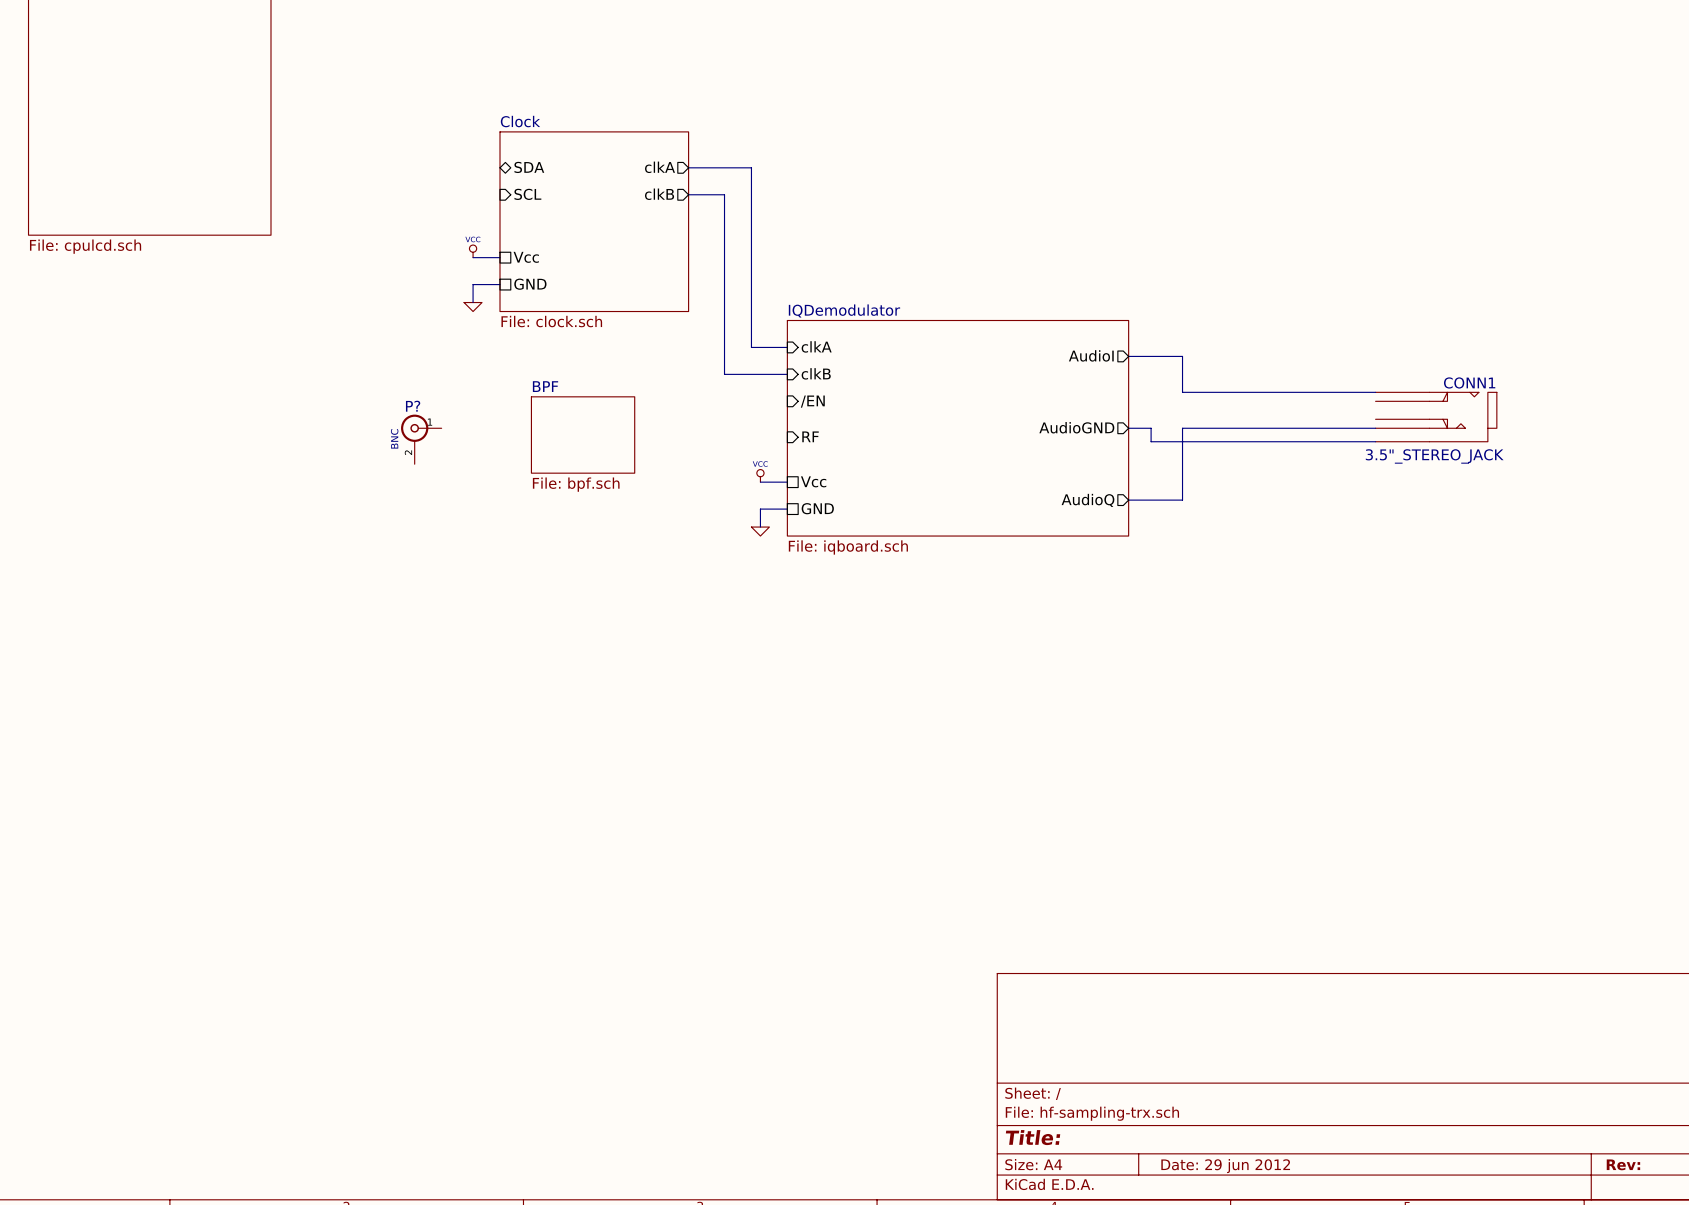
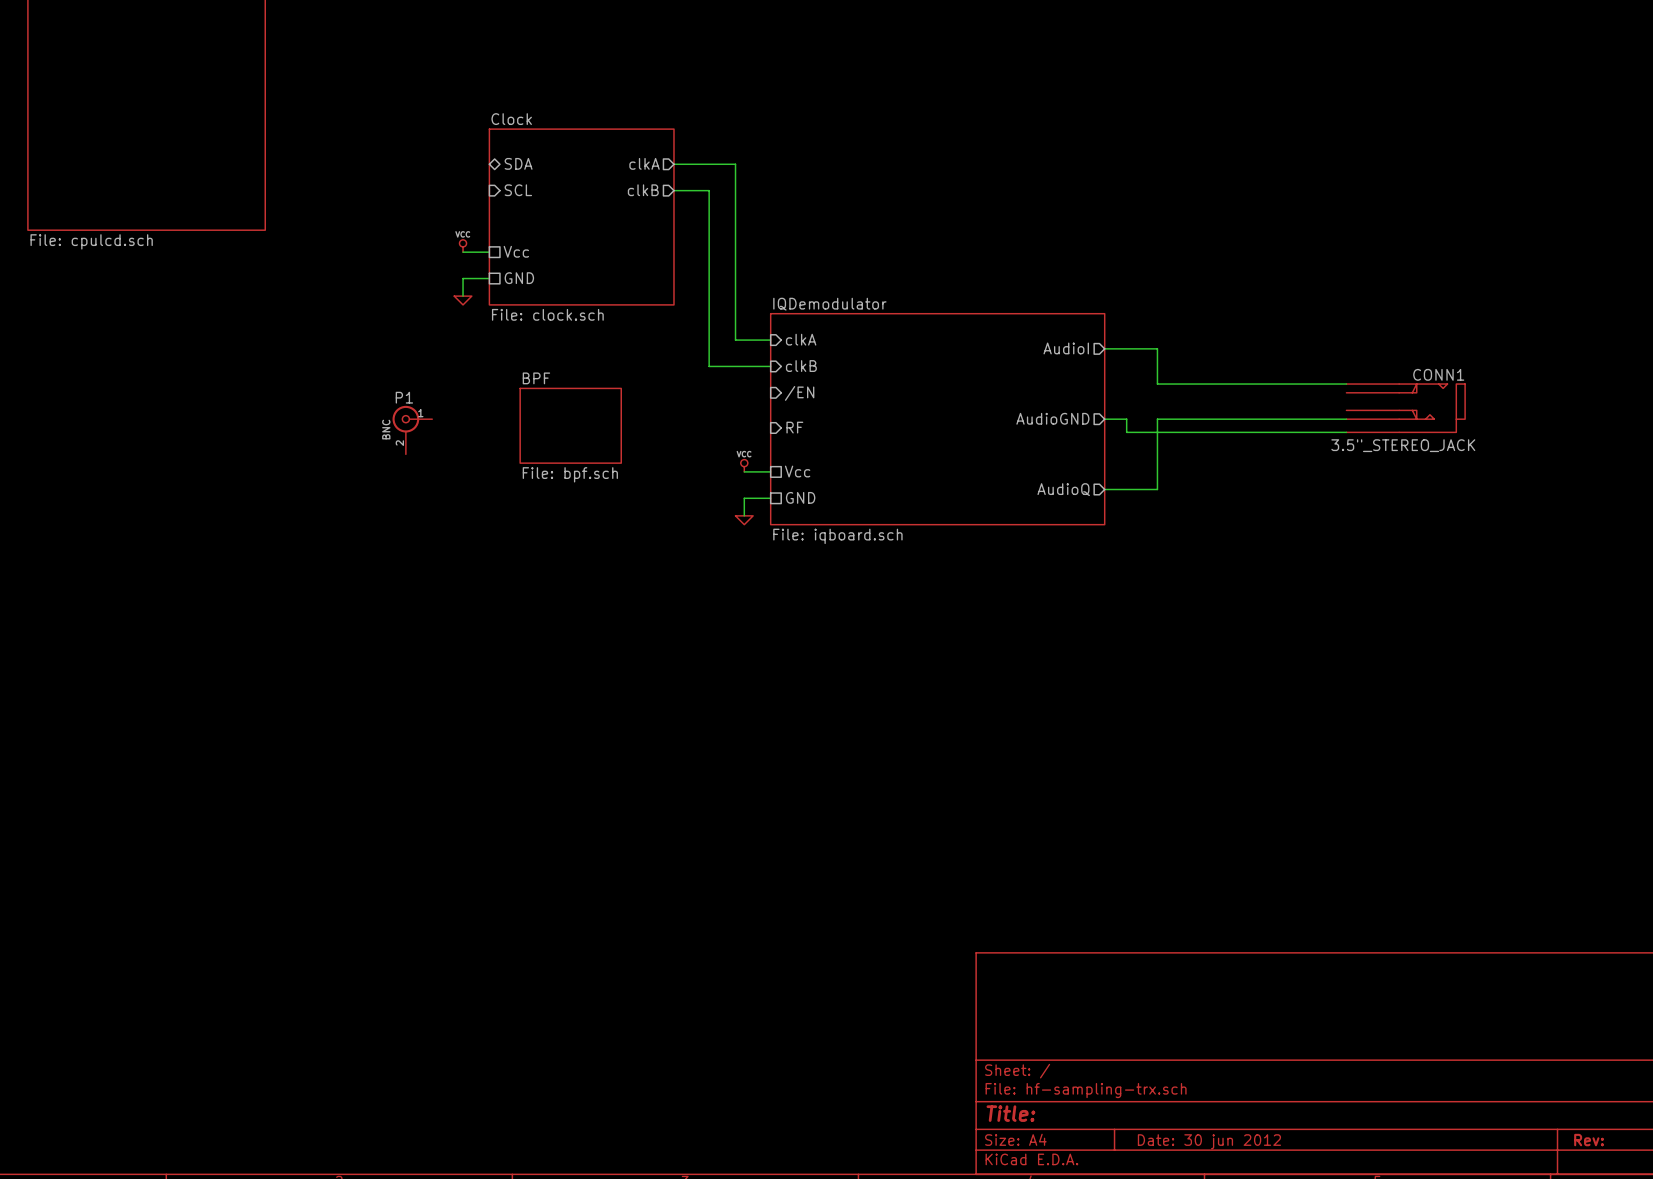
P? name: P? (413, 406) -> P1 (404, 397)
title block: Date: 29 jun 2012 (1225, 1166) -> Date: 30 jun 2012 (1209, 1141)

